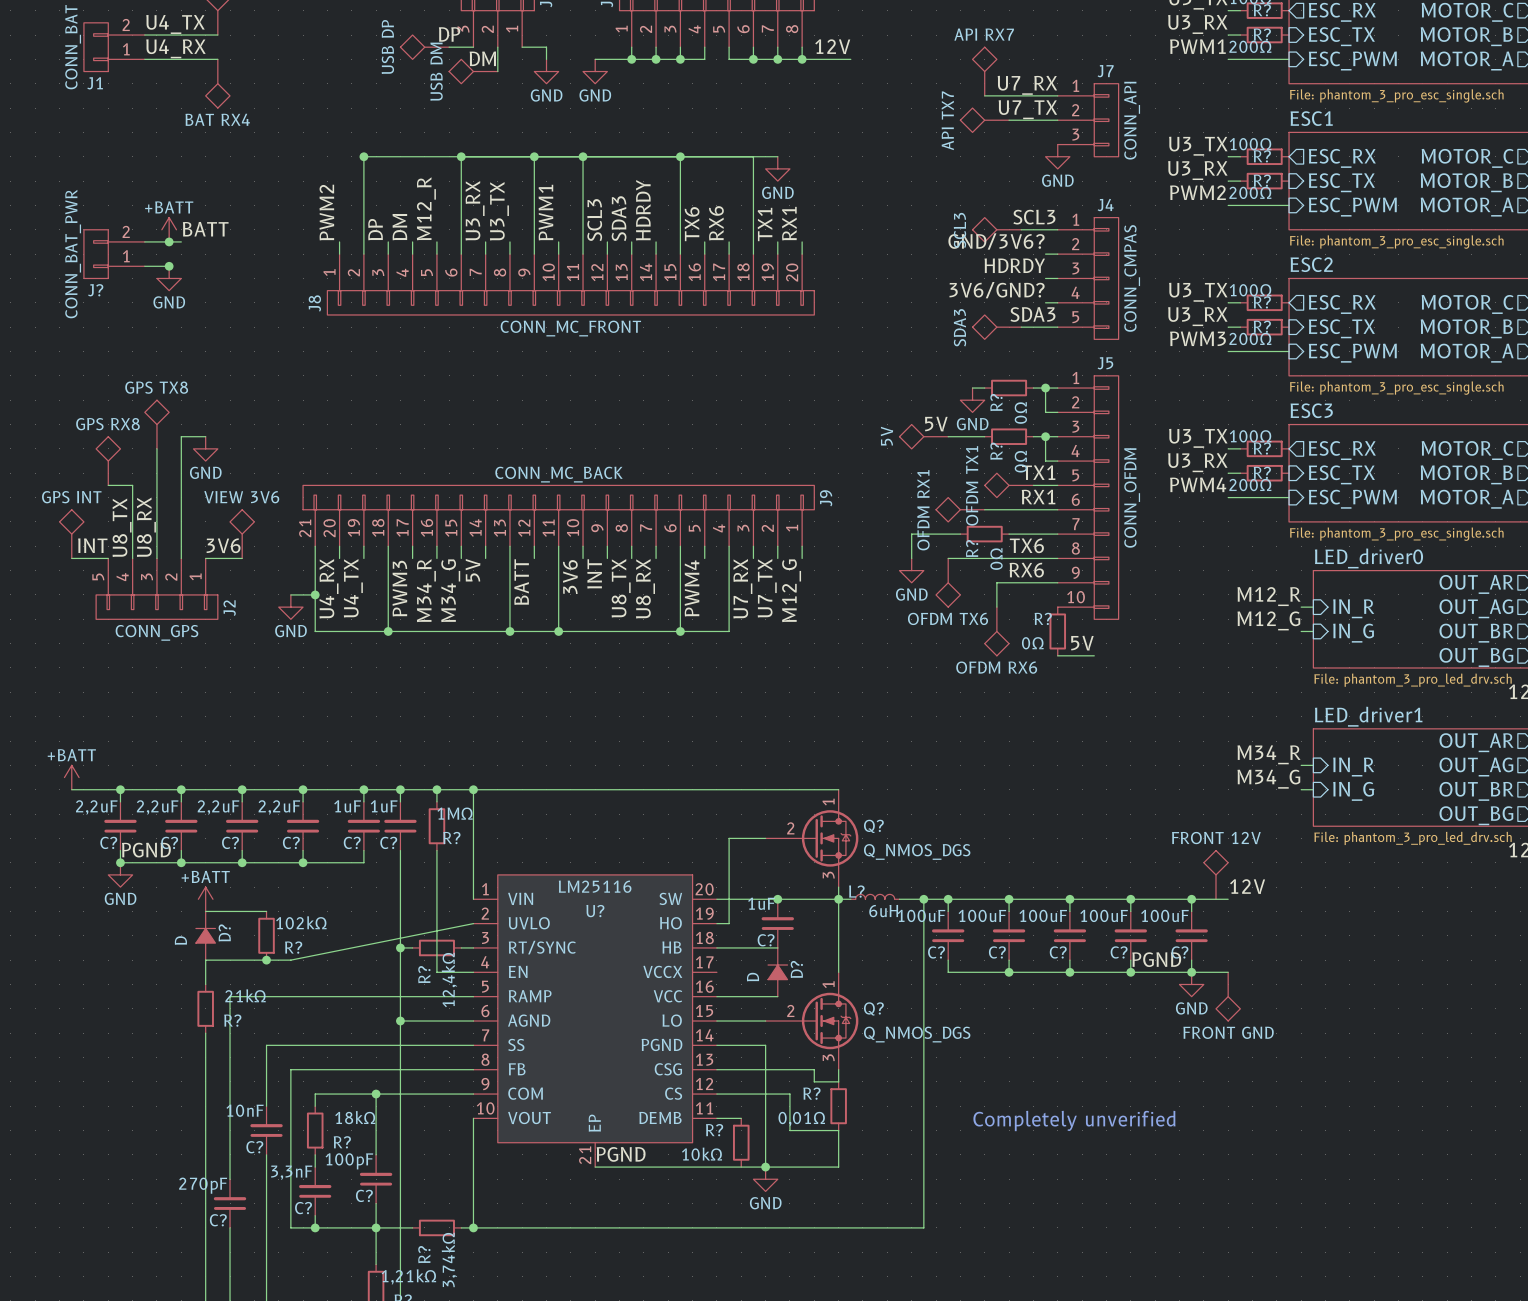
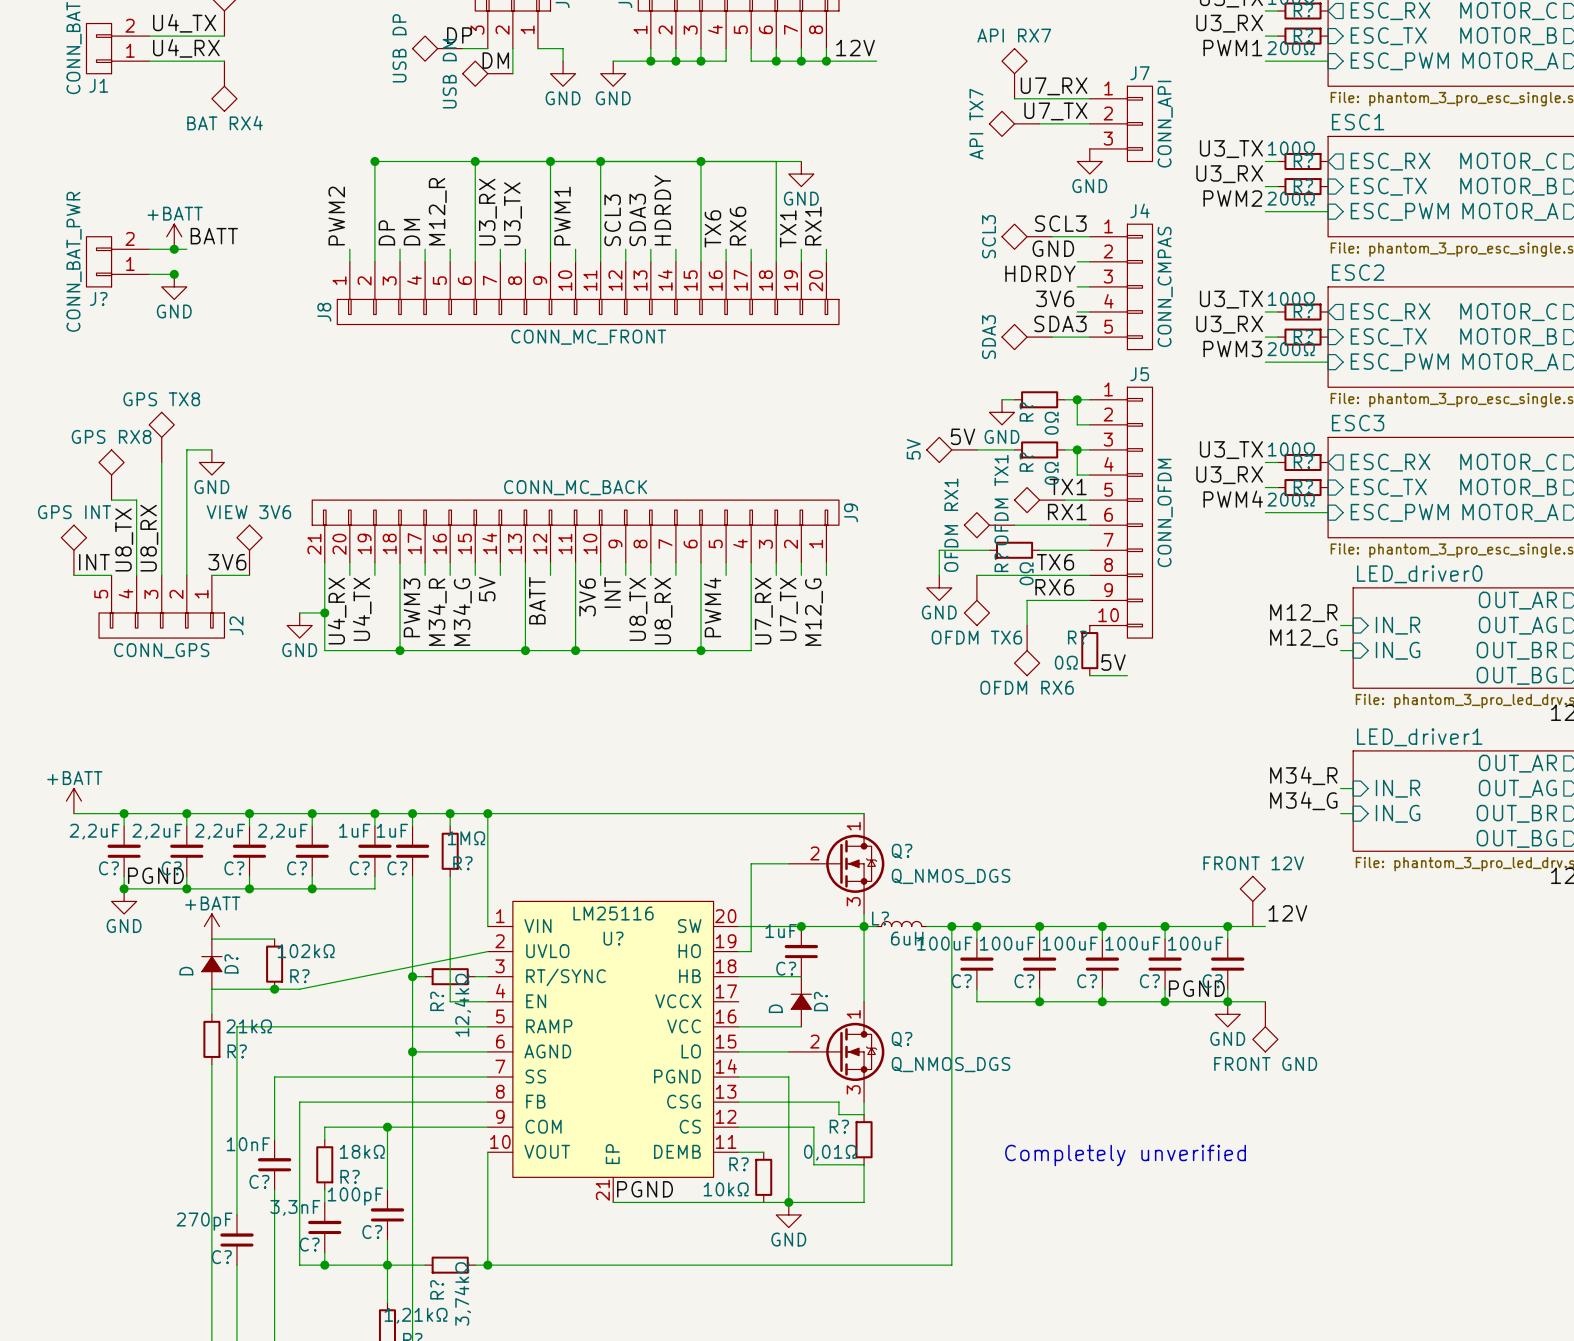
label: GND/3V6? (996, 241) -> GND (1053, 248)
label: 3V6/GND? (997, 290) -> 3V6 (1055, 298)

